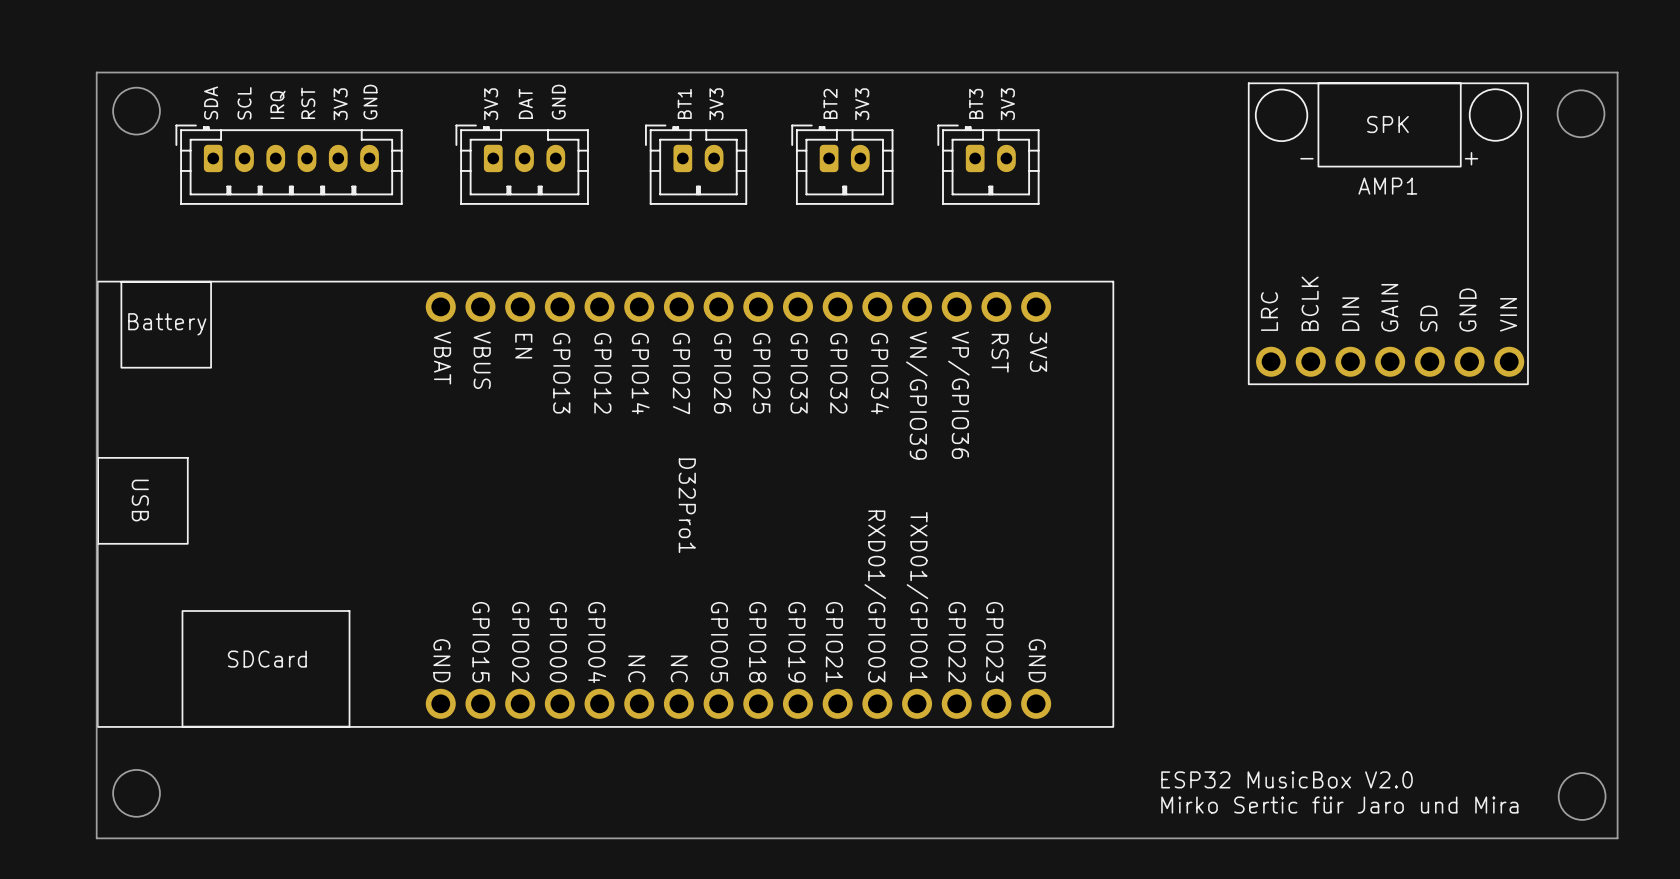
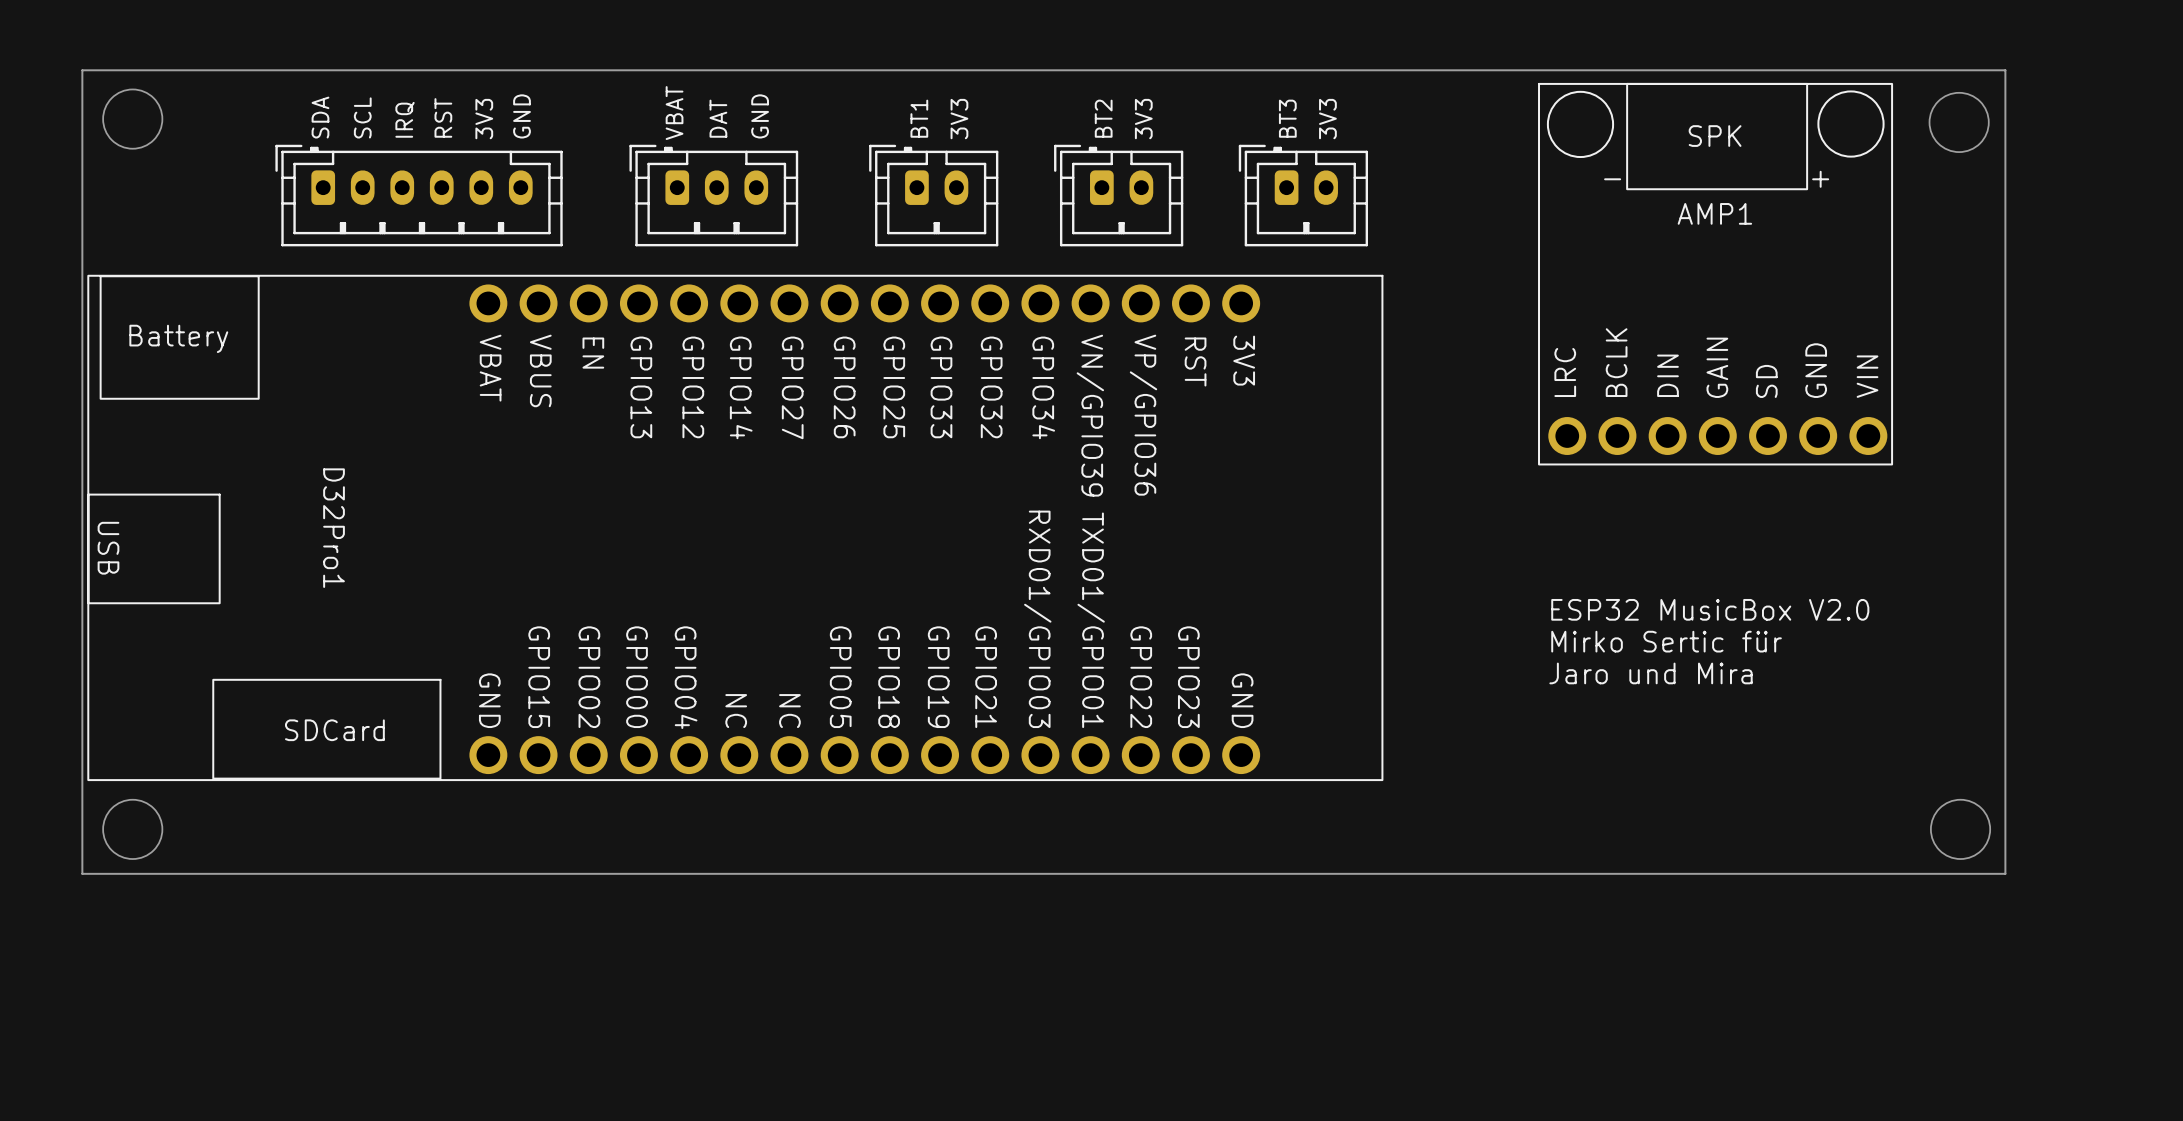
board edge: (96, 72) (1617, 72) (1617, 838) (96, 838) (96, 72) -> (82, 70) (82, 873) (2005, 873) (2005, 70) (82, 70)
text: 3V3 (491, 104) -> VBAT (674, 113)
round board edge position: (136, 111) -> (132, 119)
round board edge position: (1581, 113) -> (1959, 122)
AMP1 position: (1388, 233) -> (1715, 274)
D32Pro1 footprint: [96, 280, 1115, 728] -> [87, 274, 1384, 782]
D32Pro1 name position: D32Pro1 (687, 505) -> D32Pro1 (334, 528)
text: none -> Mirko Sertic für (1666, 641)
text: none -> Jaro und Mira (1651, 673)
text position: ESP32 MusicBox V2.0 (1286, 779) -> ESP32 MusicBox V2.0 (1710, 609)
round board edge position: (136, 793) -> (132, 829)
round board edge position: (1582, 796) -> (1960, 829)
text: Mirko Sertic für Jaro und Mira (1339, 805) -> none

